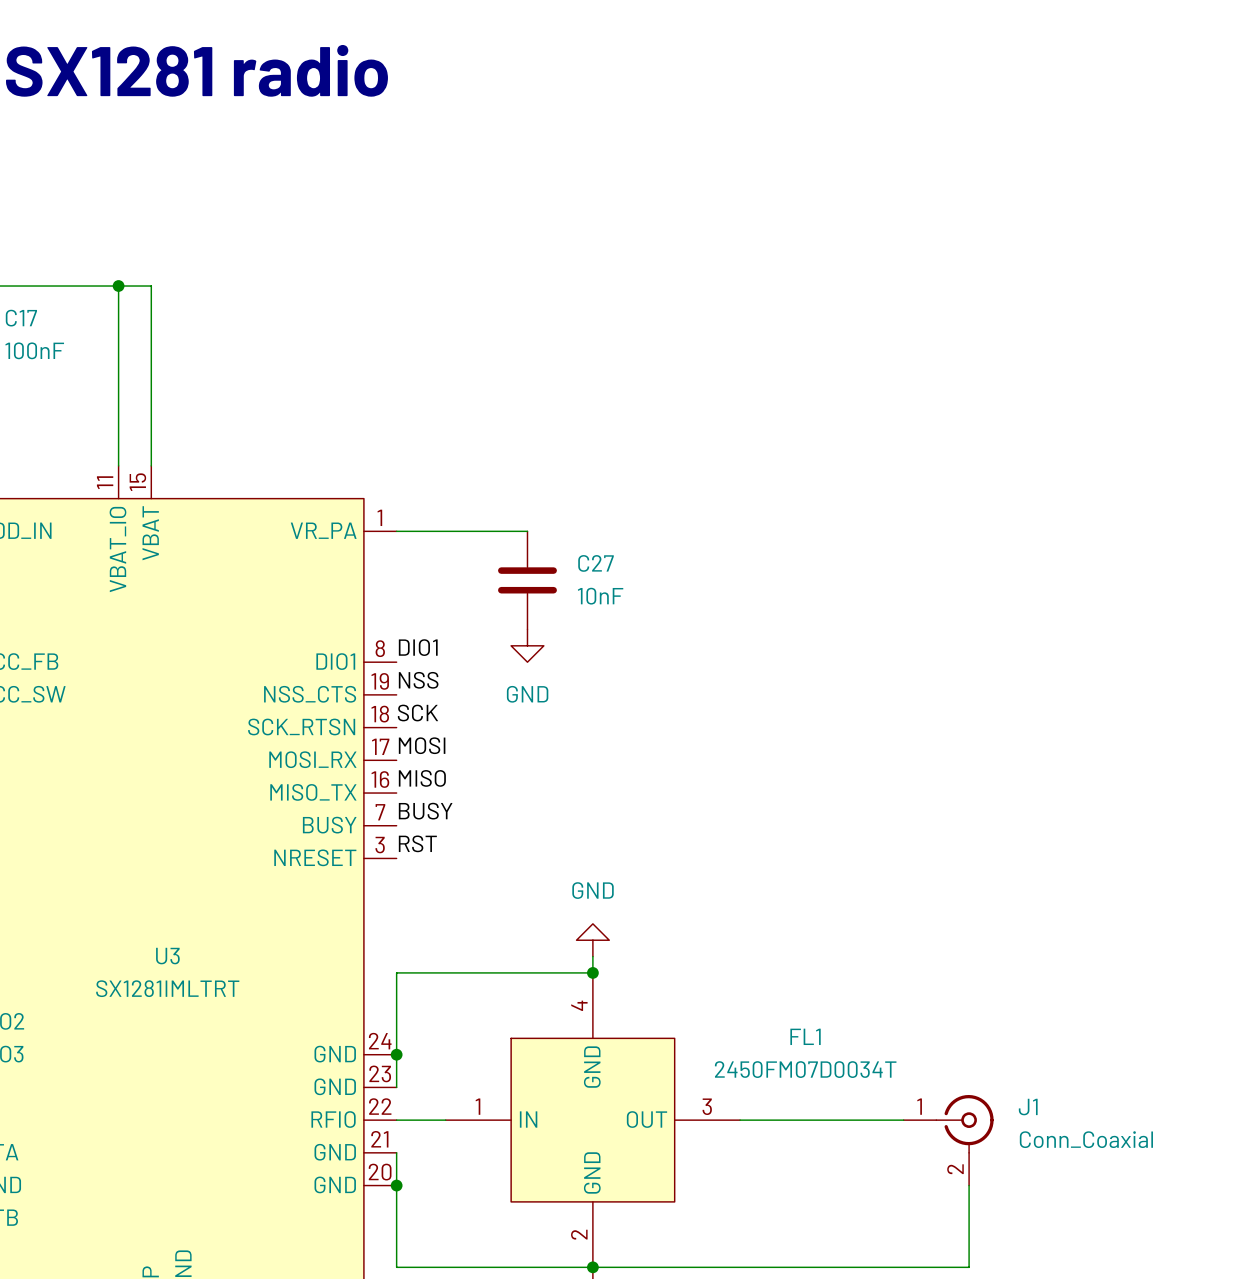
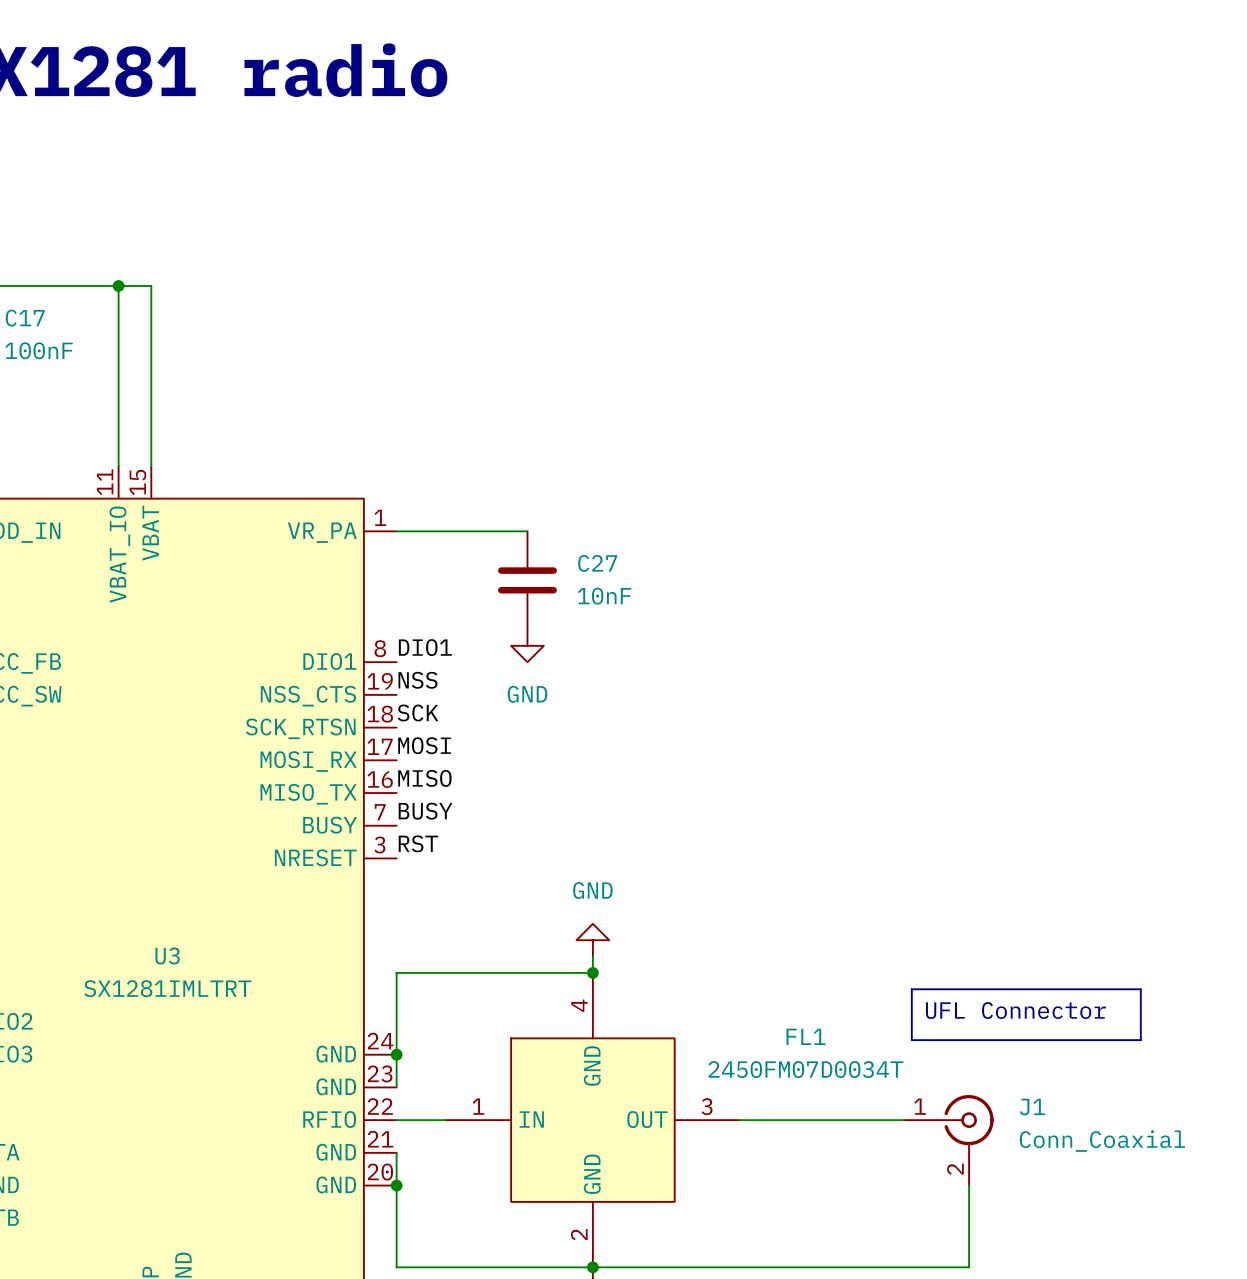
line: none -> (911, 989) (1140, 989) (1140, 1040) (911, 1040) (911, 989)
text: none -> UFL Connector (1015, 1010)

